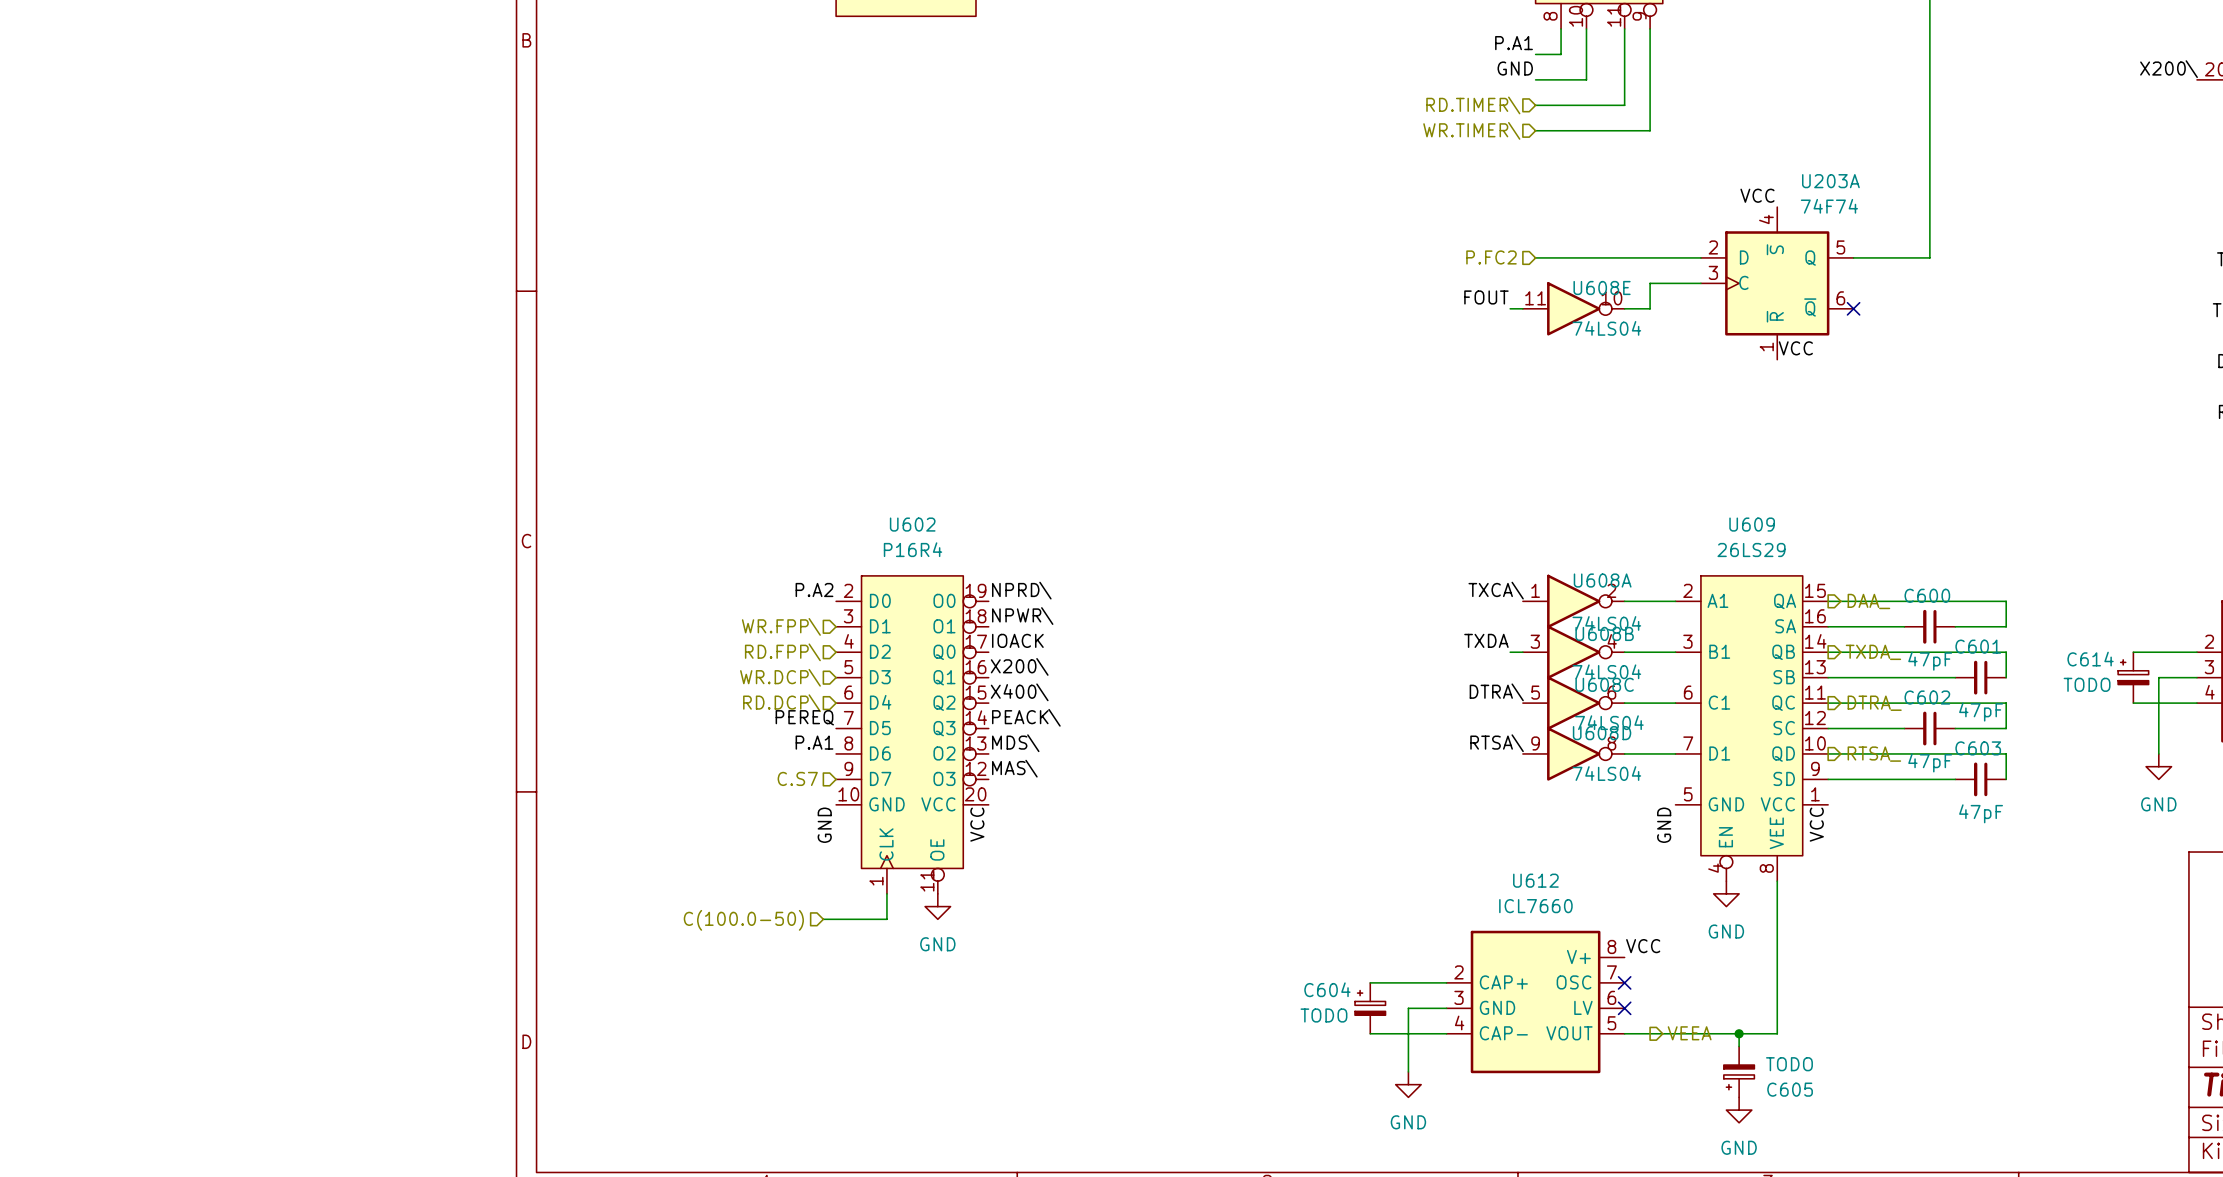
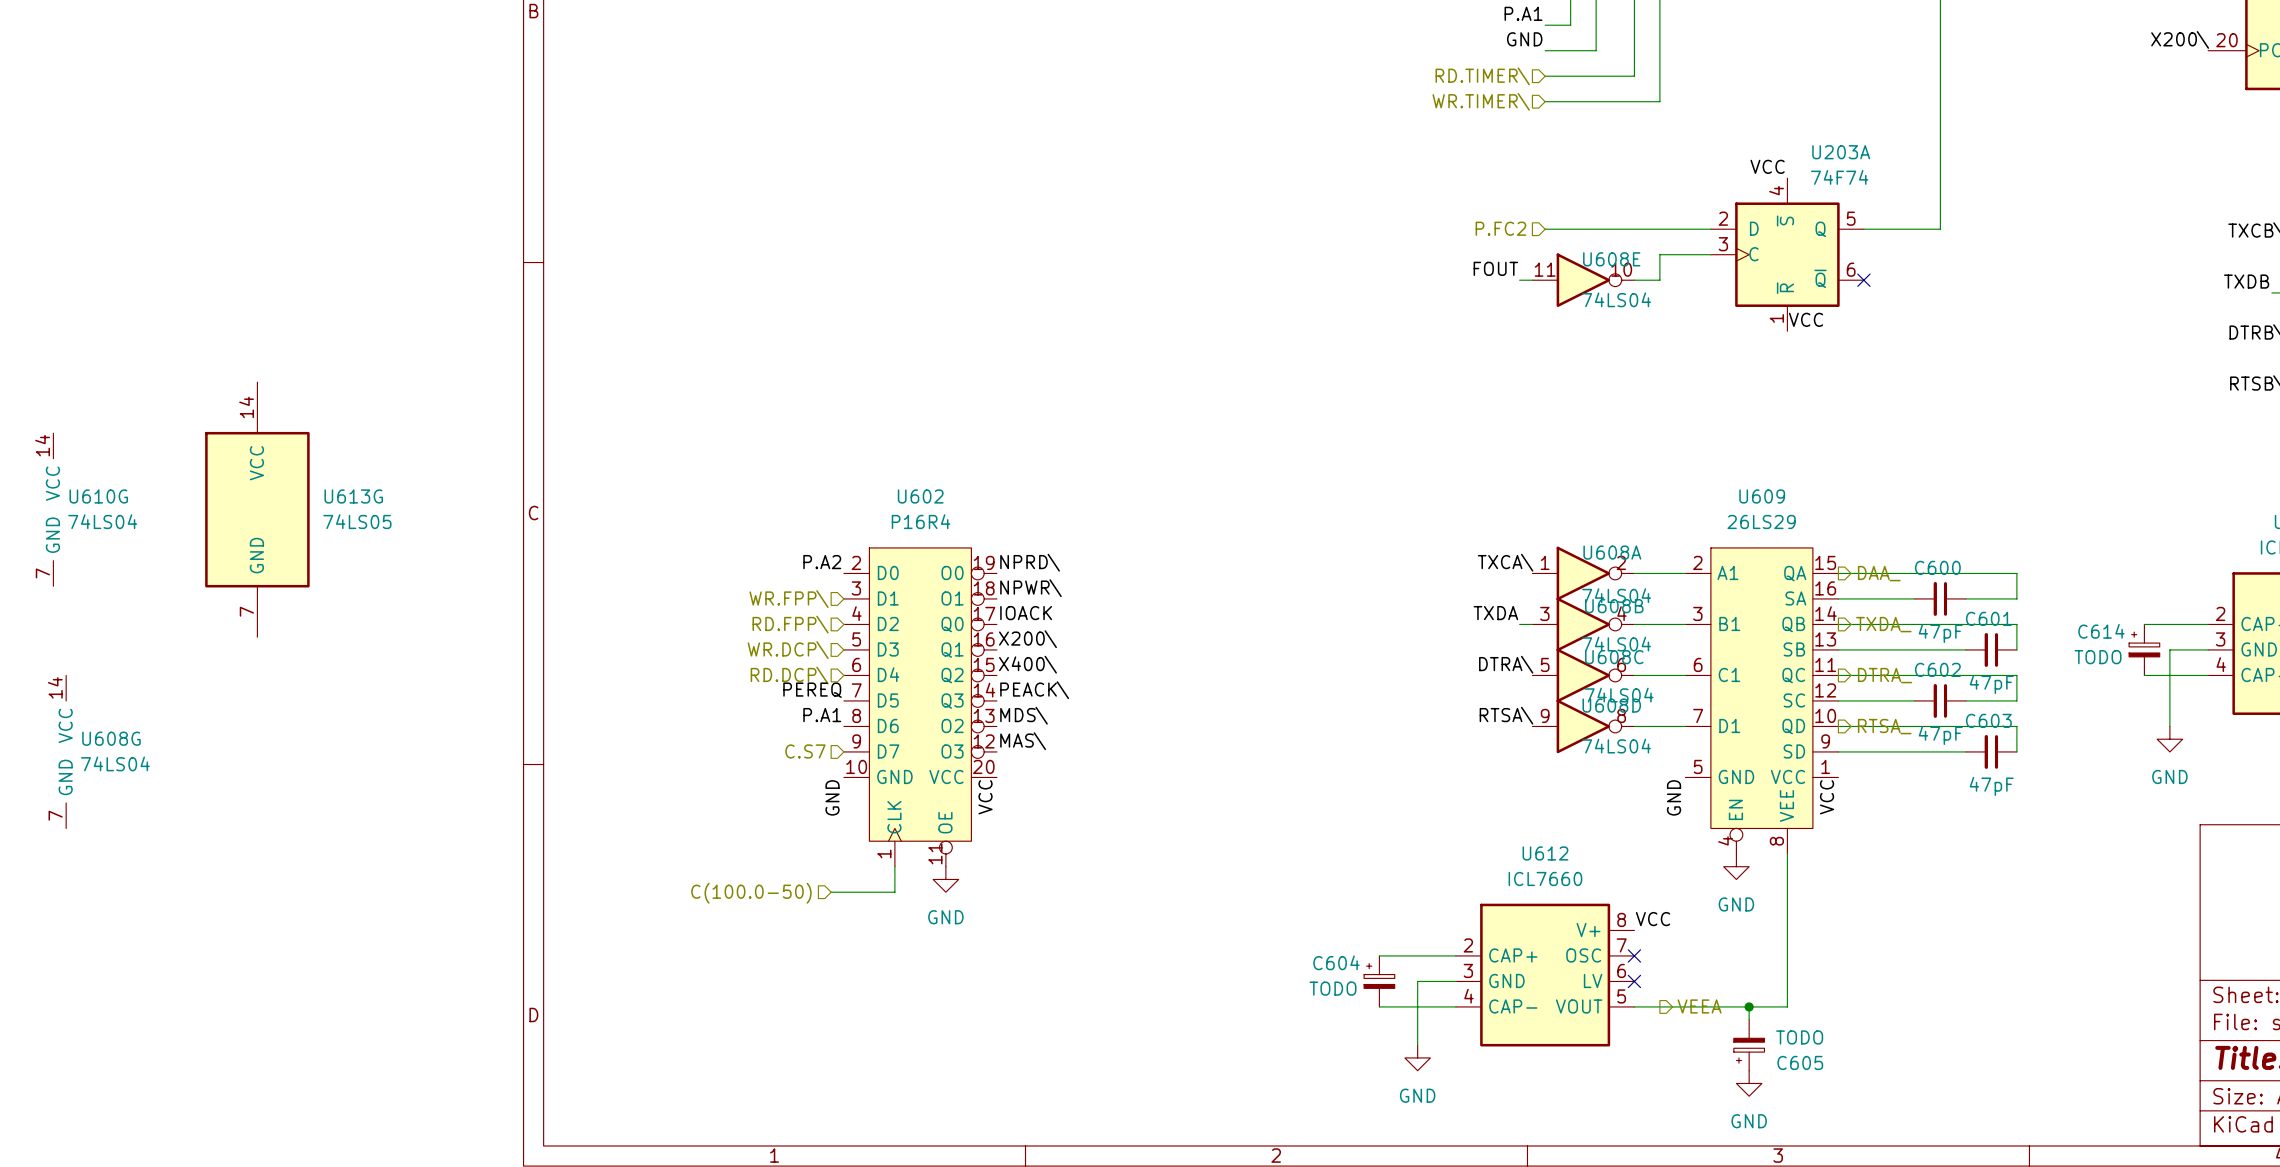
U610G: none -> 74LS04 (53, 509)
U613G: none -> 74LS05 (257, 509)
U608G: none -> 74LS04 (66, 751)

